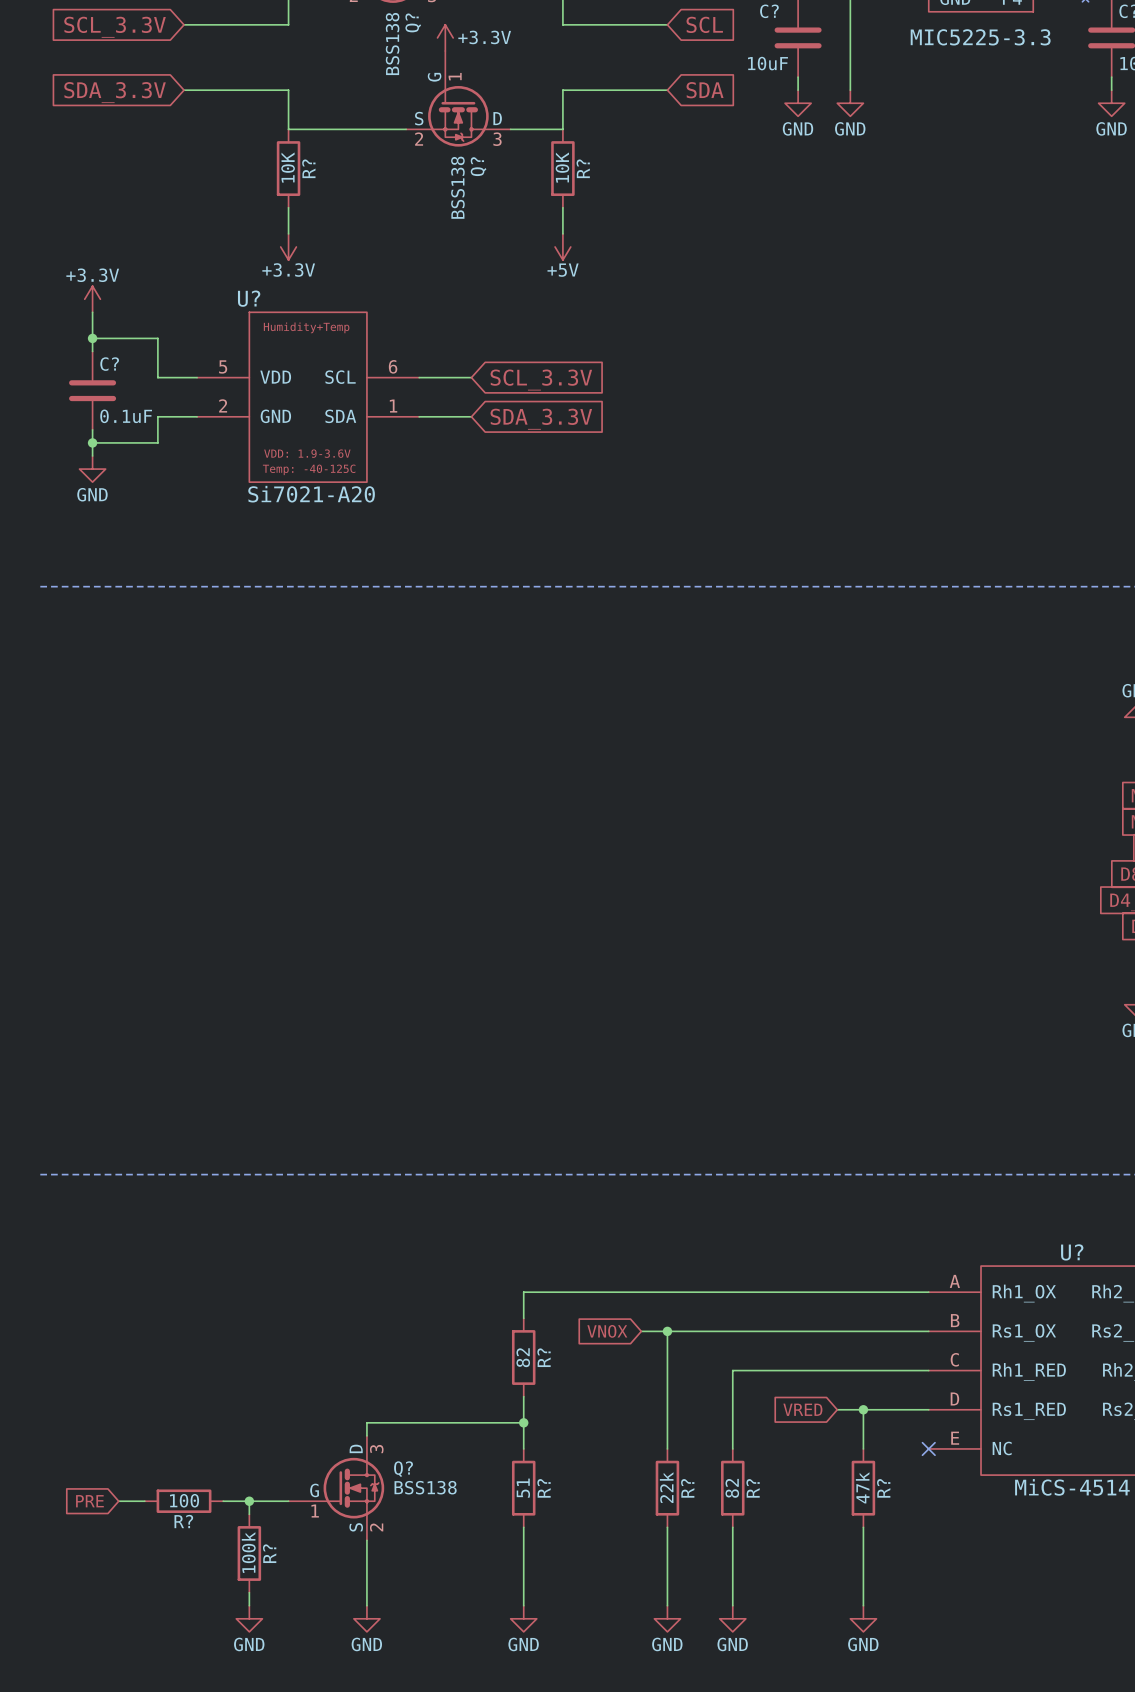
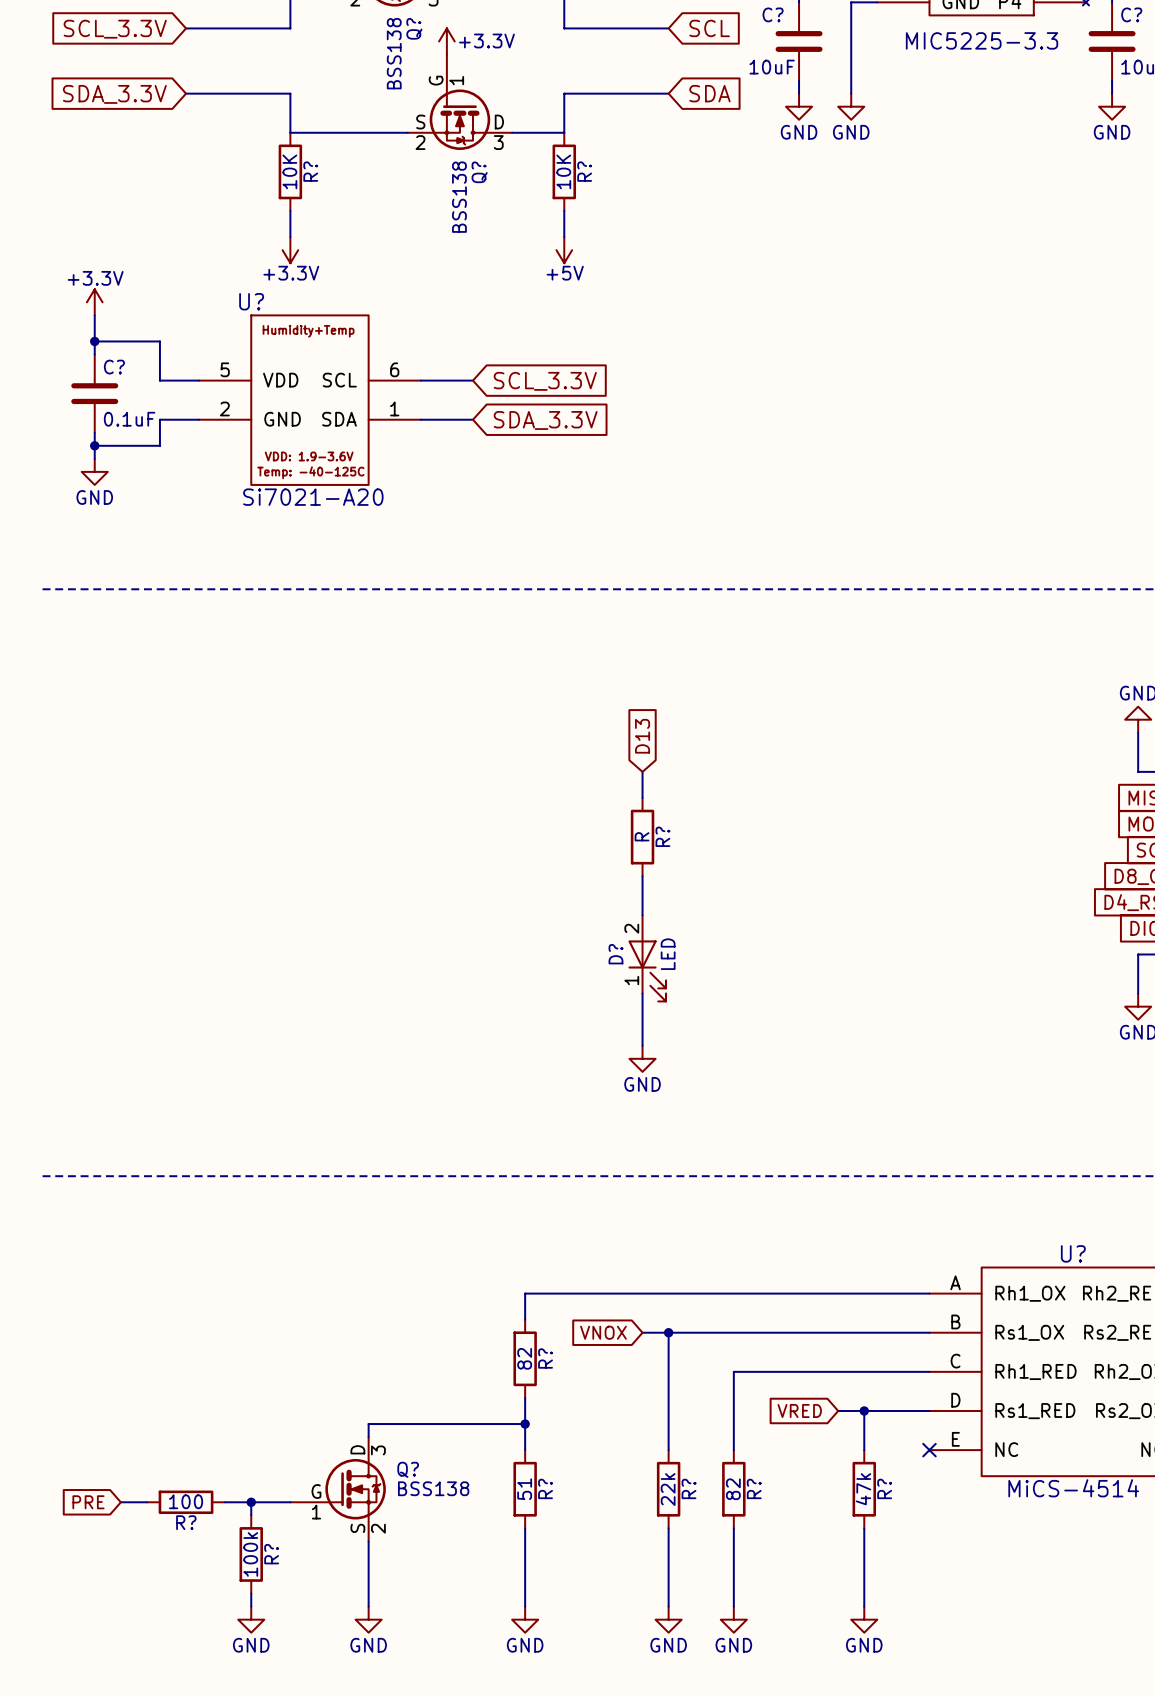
global label: none -> D13 (642, 736)
wire: none -> (642, 771) (642, 797)
R?: none -> R (642, 837)
wire: none -> (642, 876) (642, 915)
D?: none -> LED (647, 958)
wire: none -> (642, 993) (642, 1045)
power symbol: none -> GND (642, 1058)

